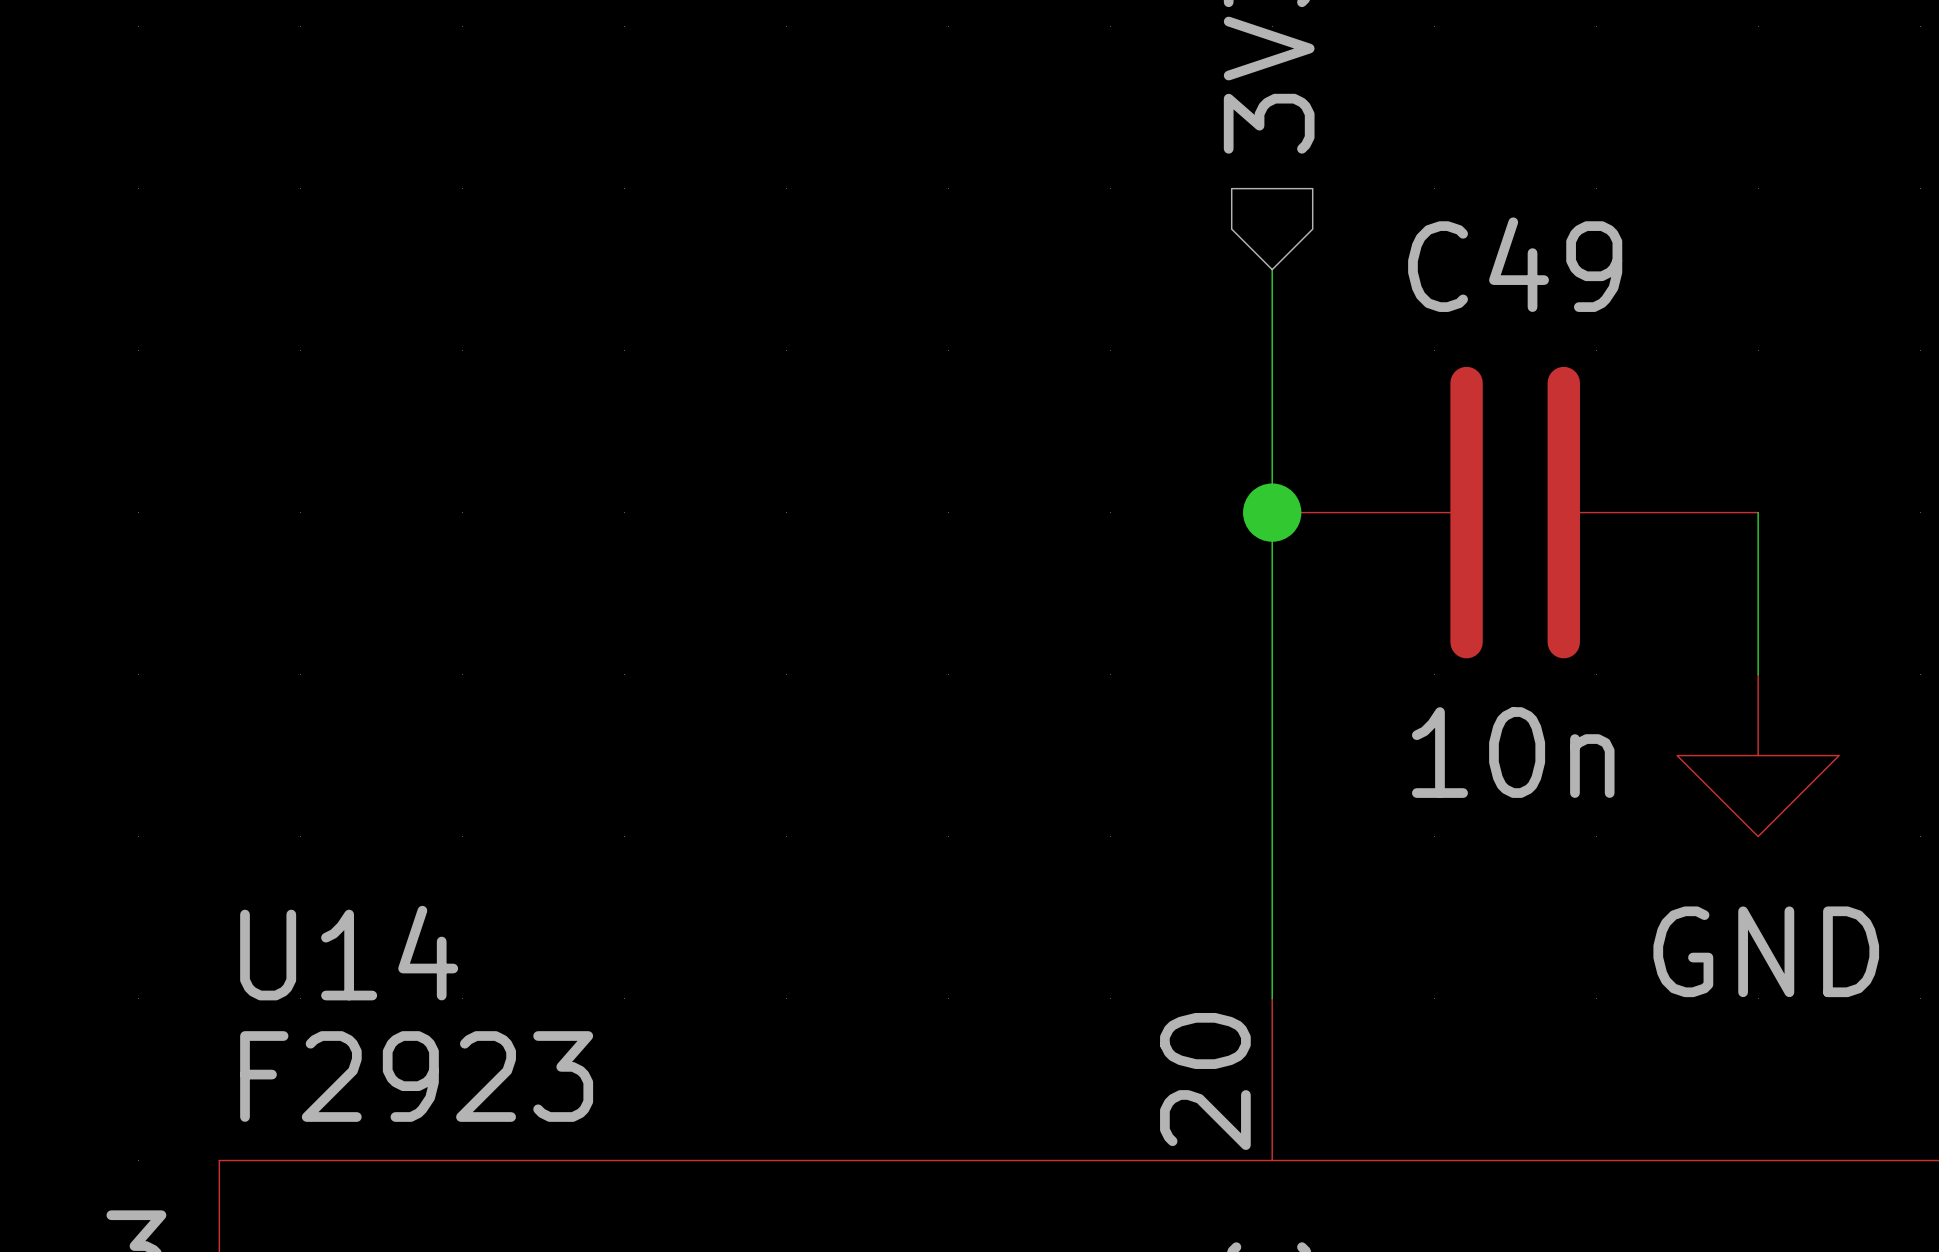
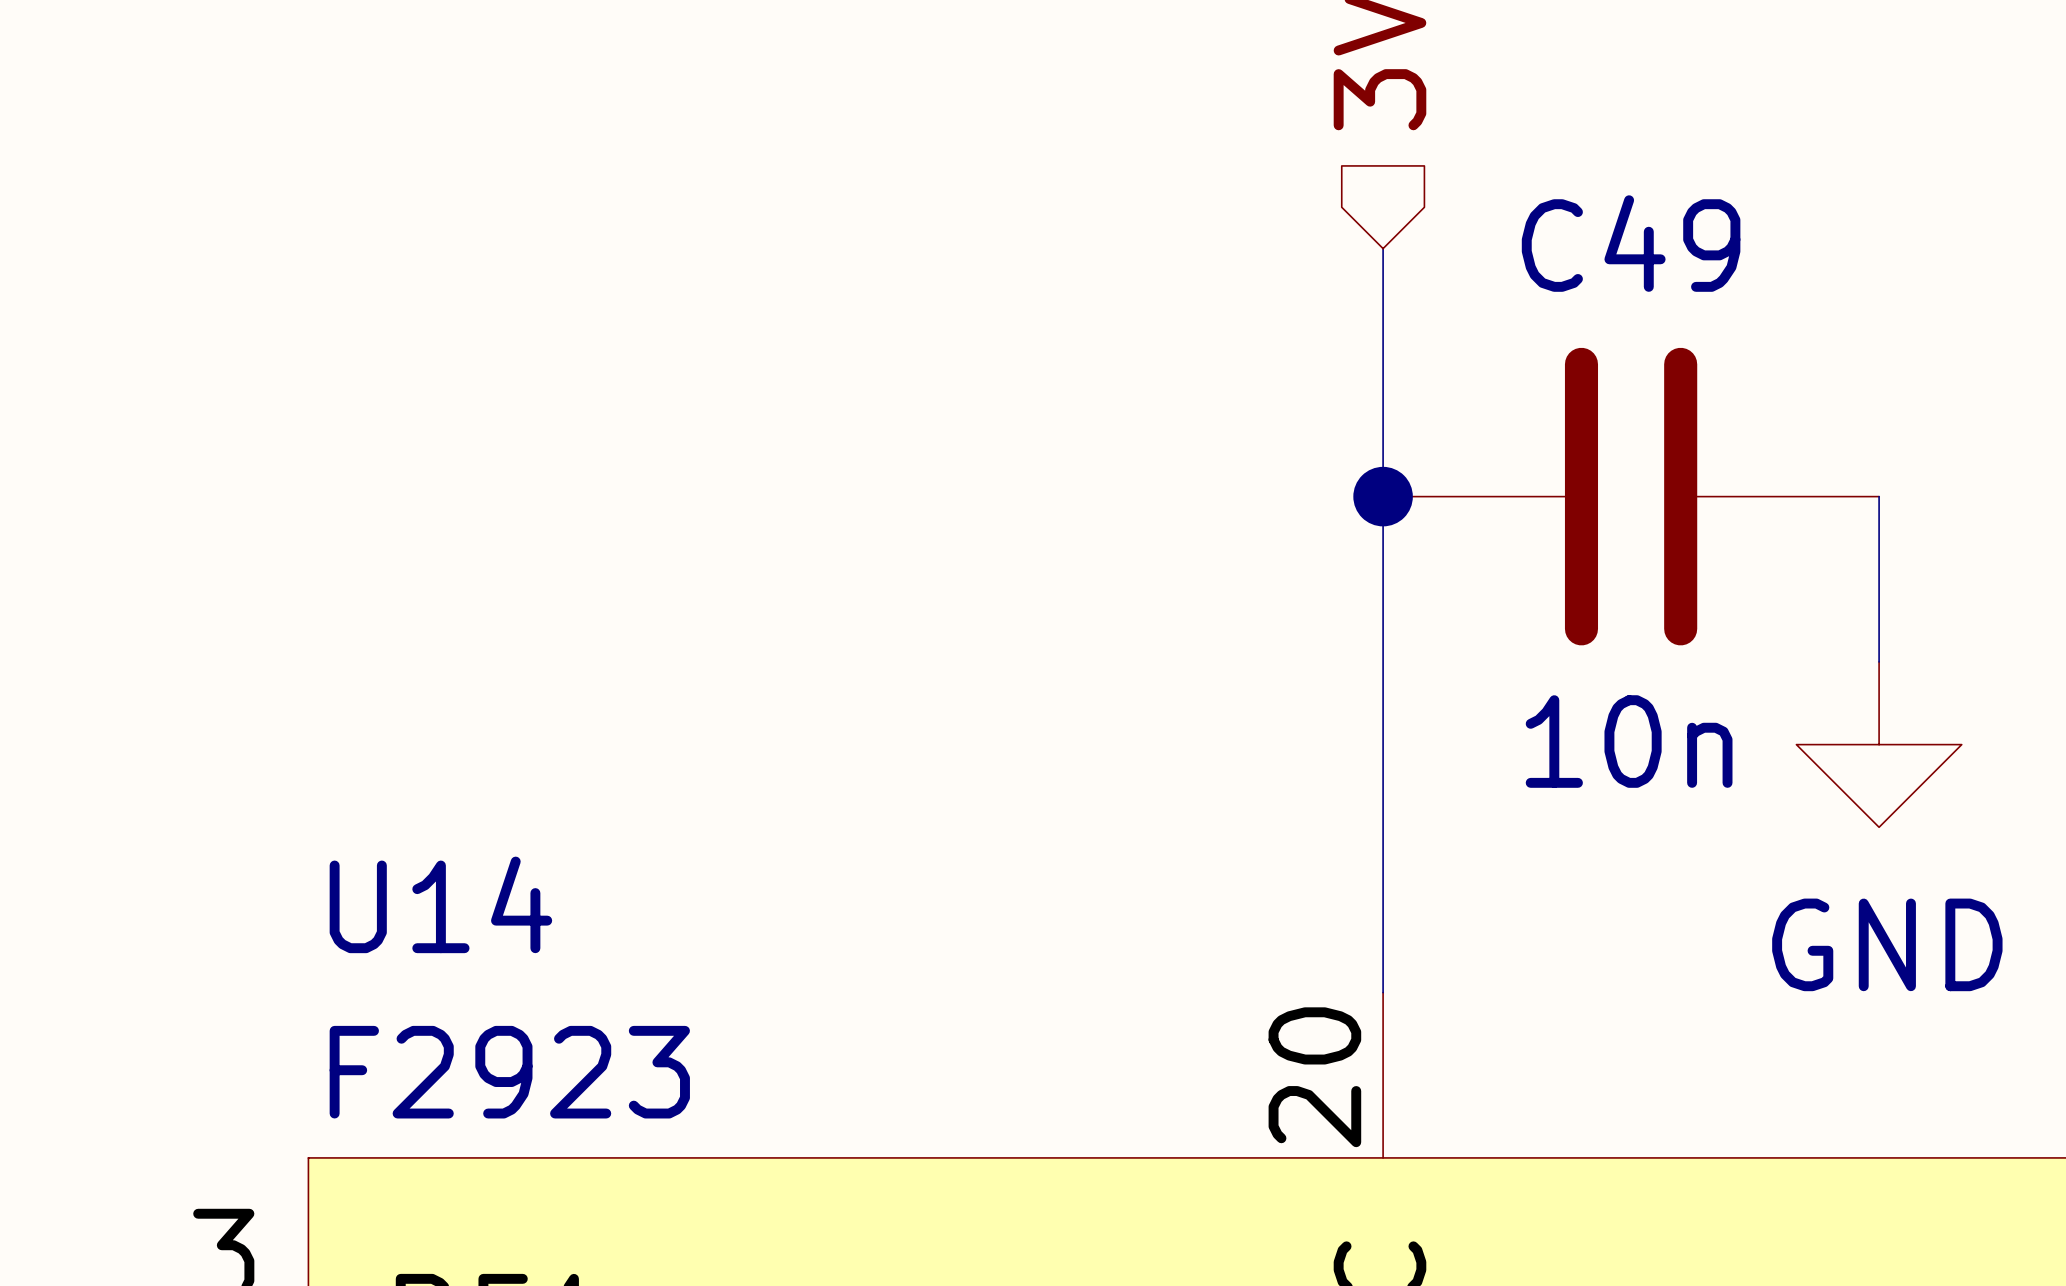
U14 name position: U14 (349, 953) -> U14 (440, 904)

